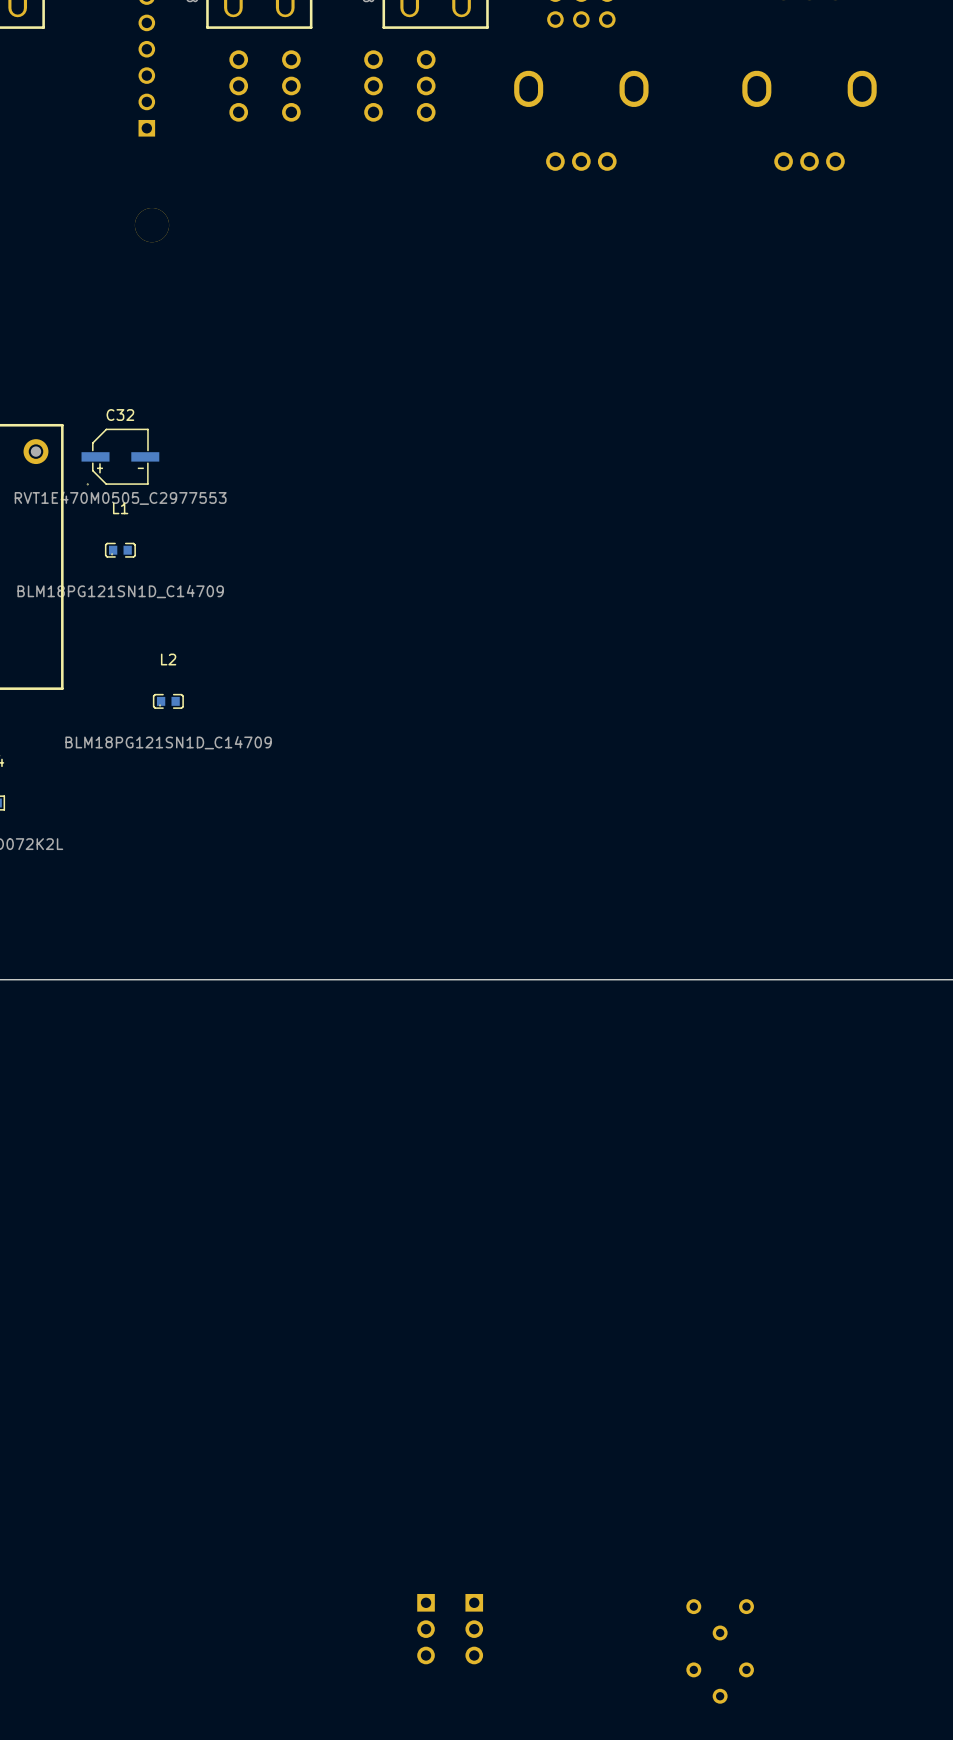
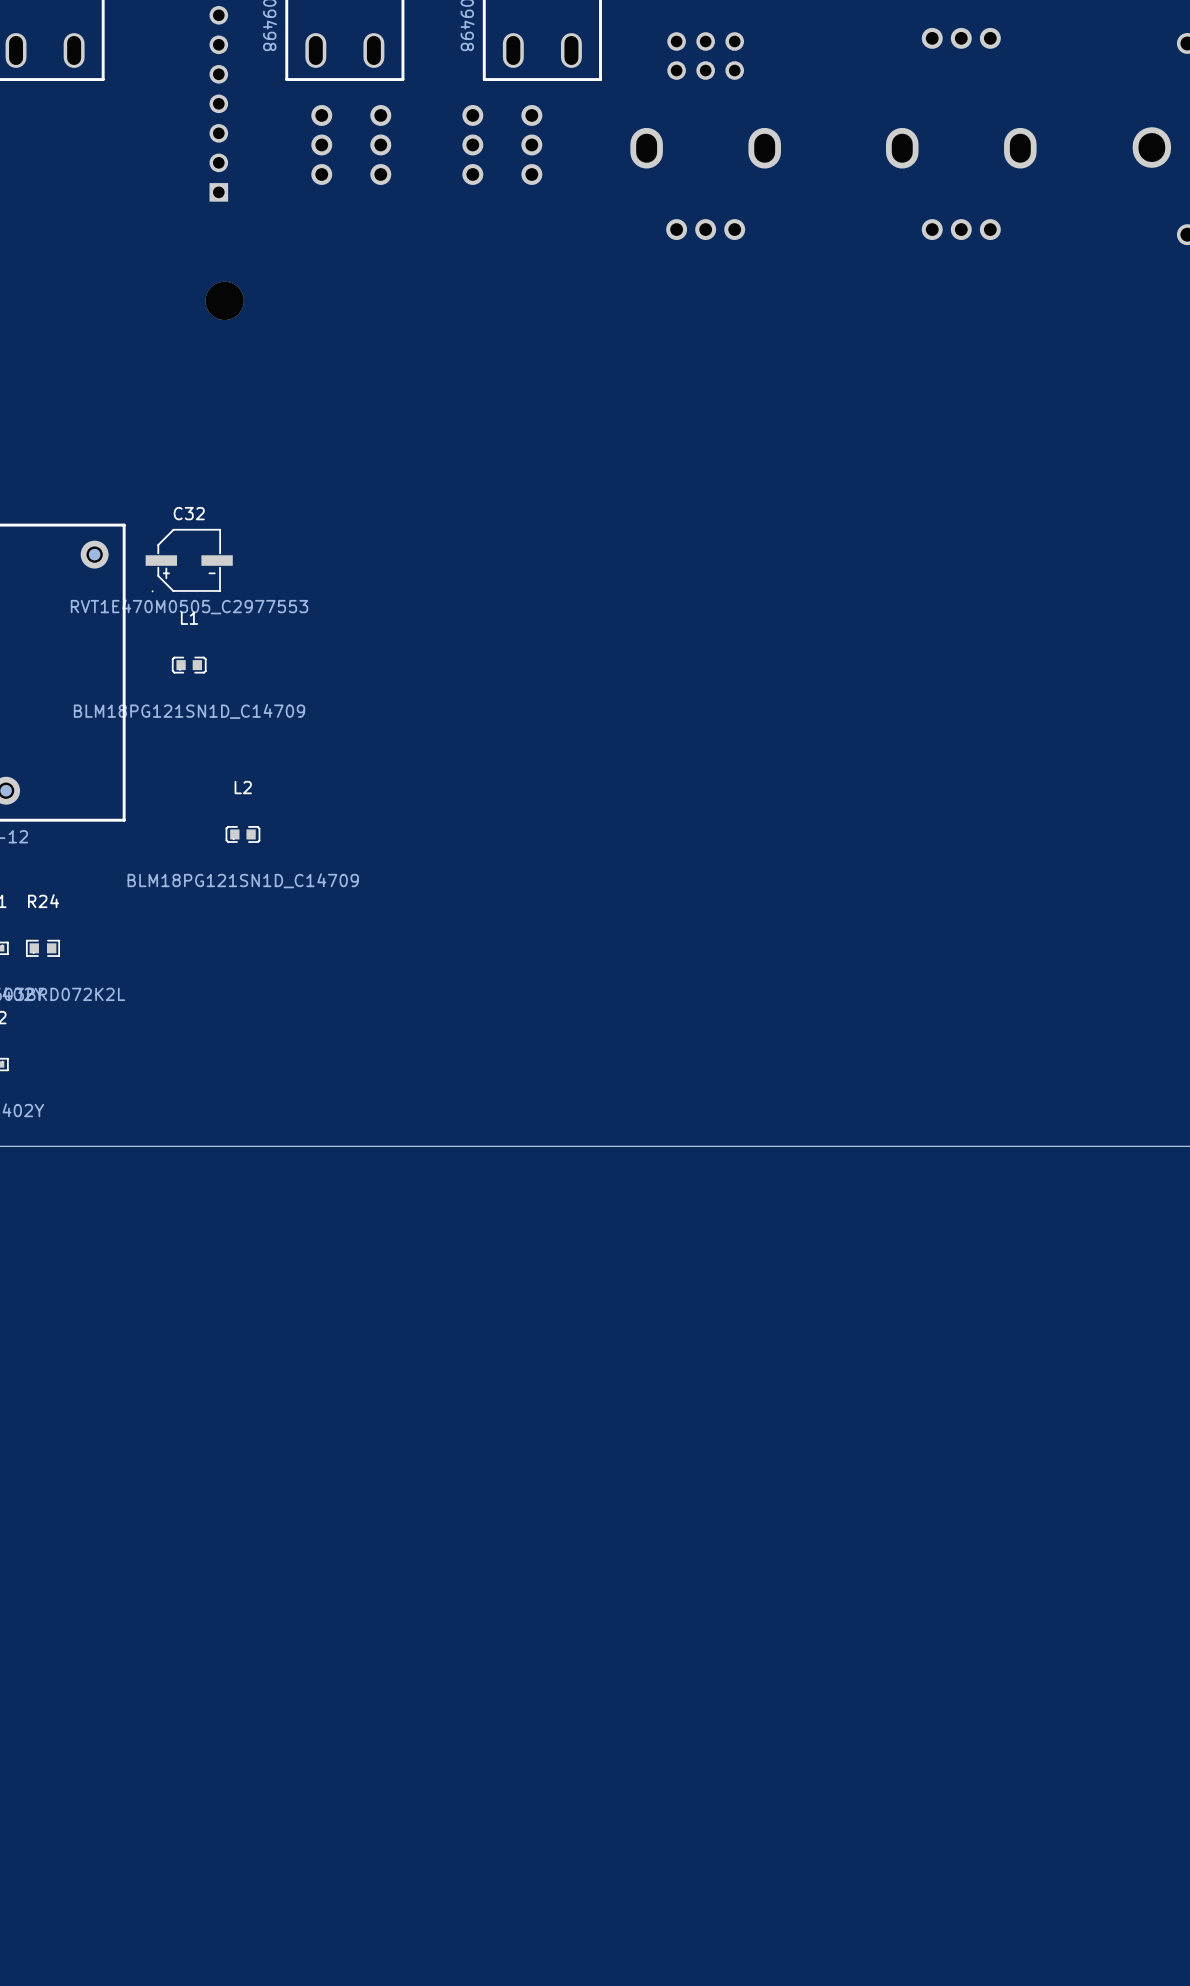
part: (720, 1619) -> none
part: (426, 1629) -> none
part: (474, 1629) -> none
part: (720, 1683) -> none

